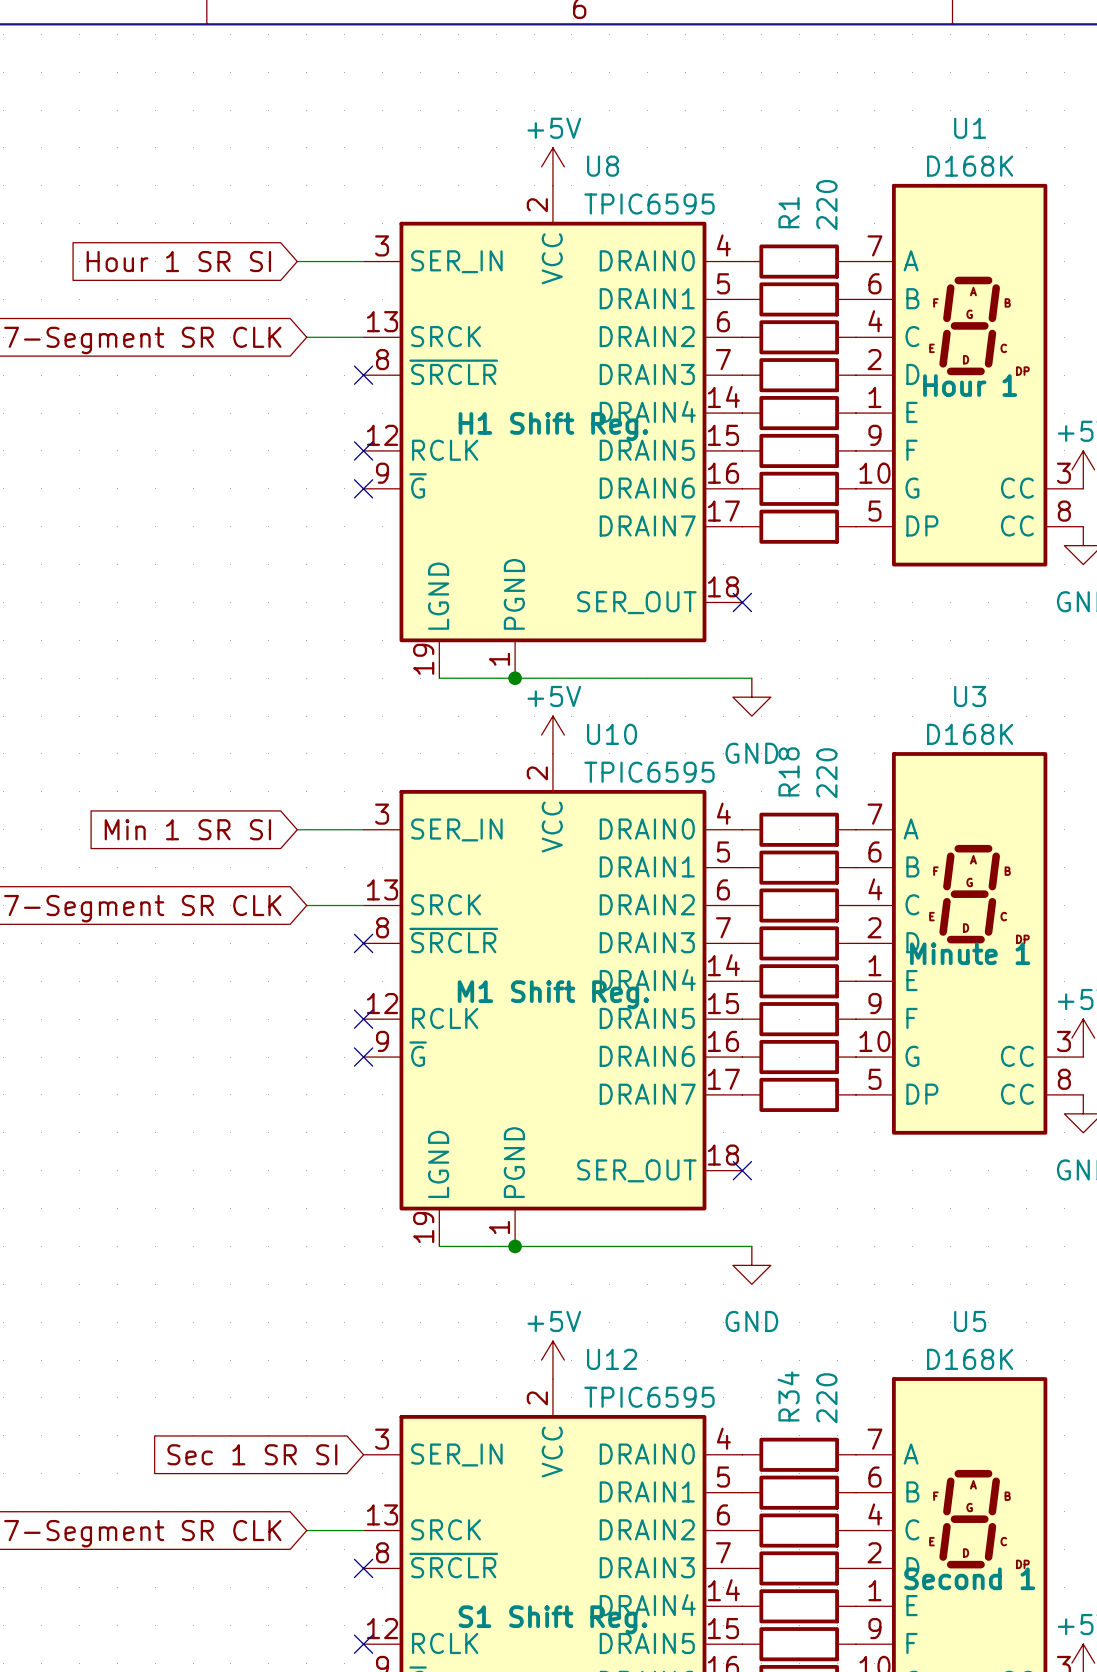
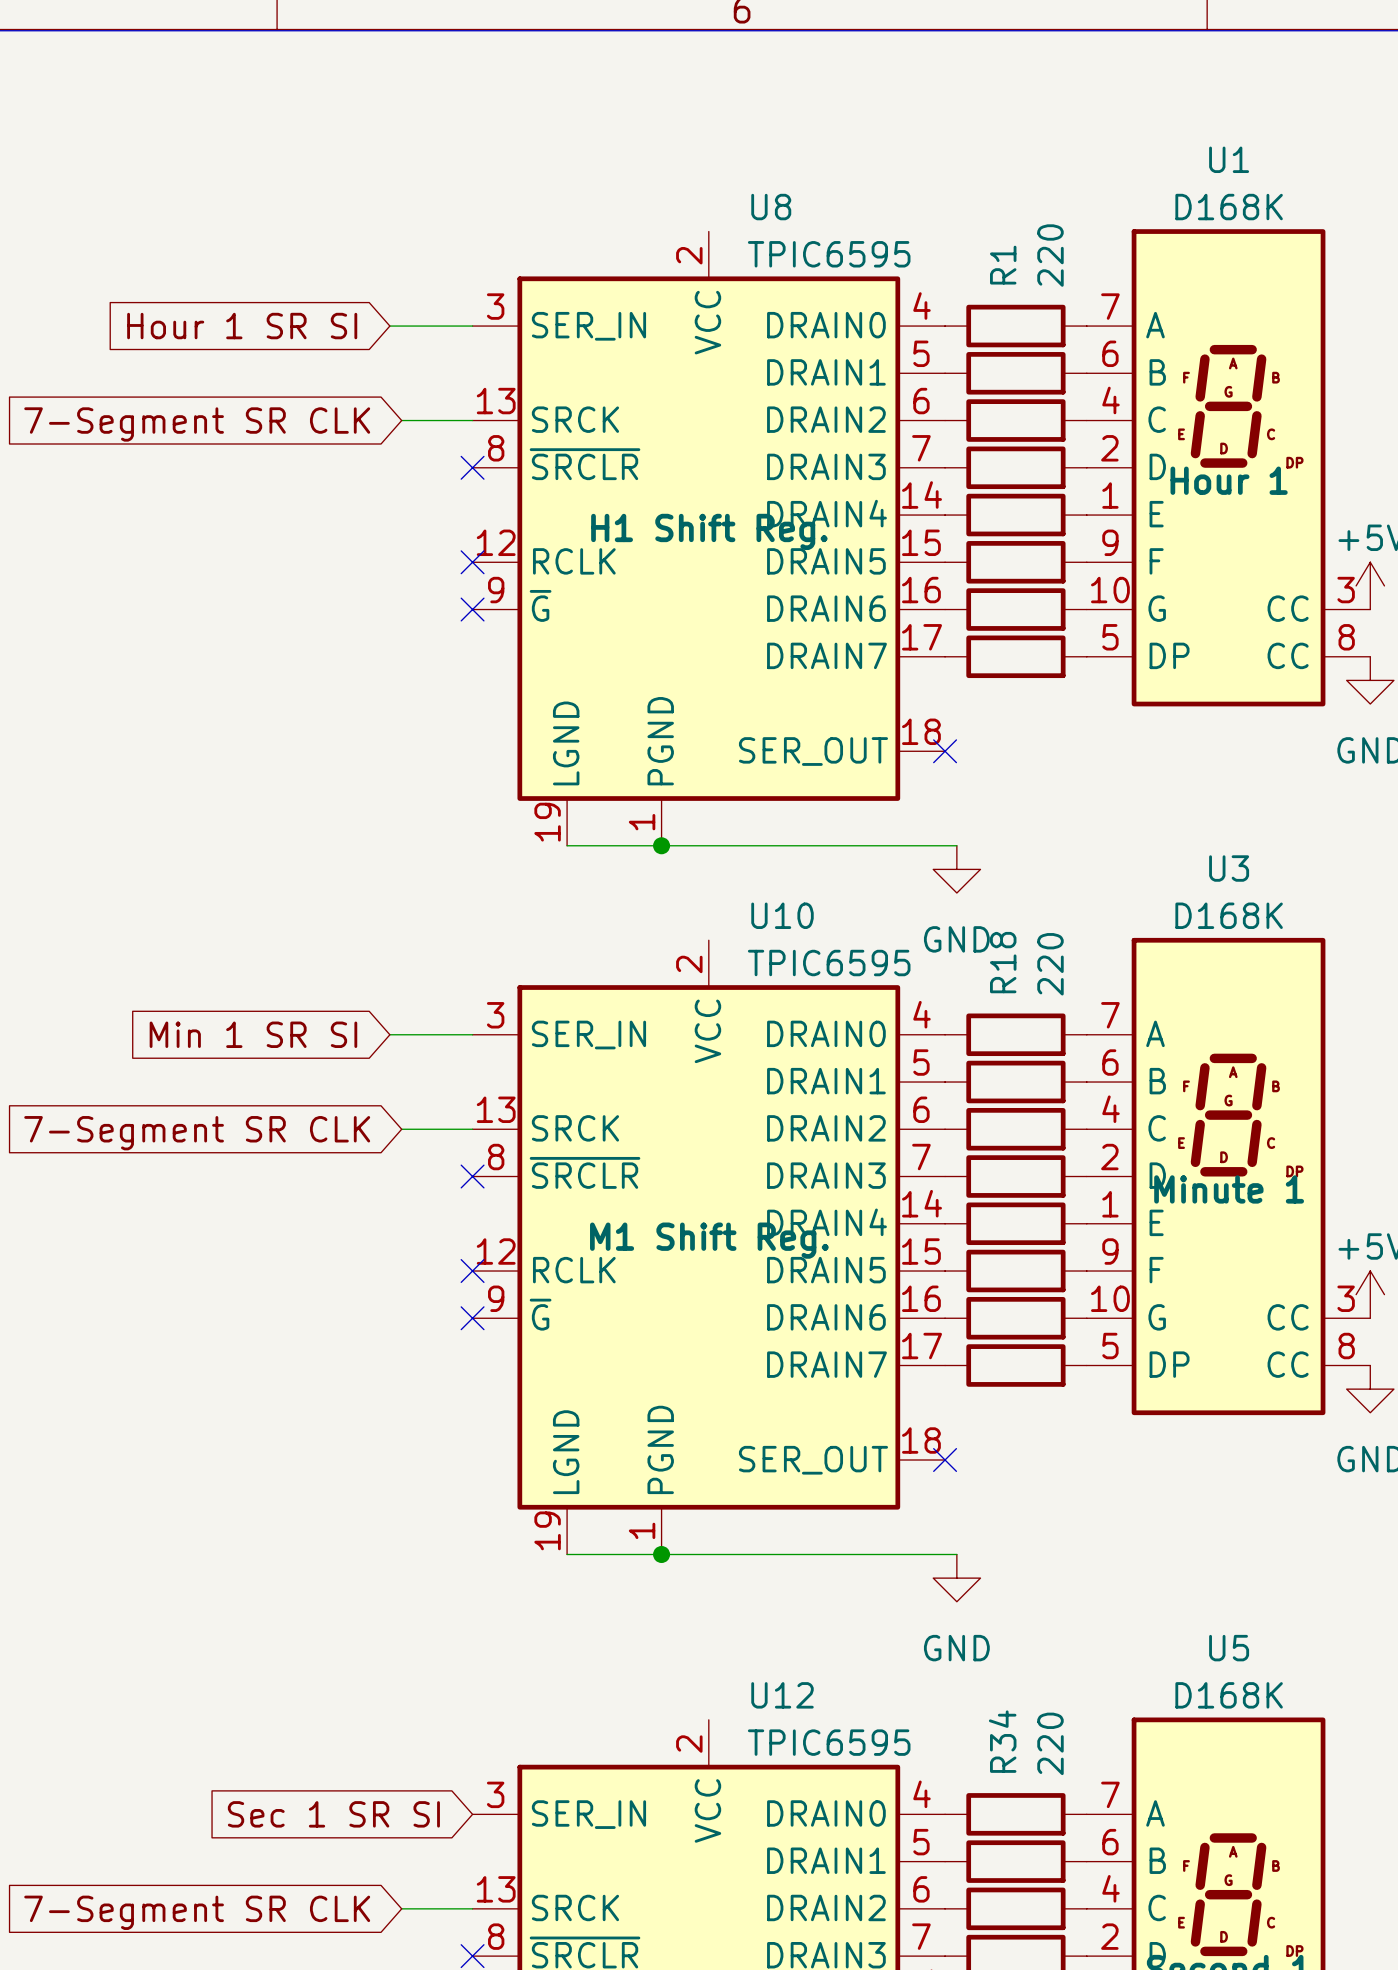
power symbol: +5V (552, 166) -> none
power symbol: +5V (552, 735) -> none
power symbol: +5V (552, 1360) -> none

